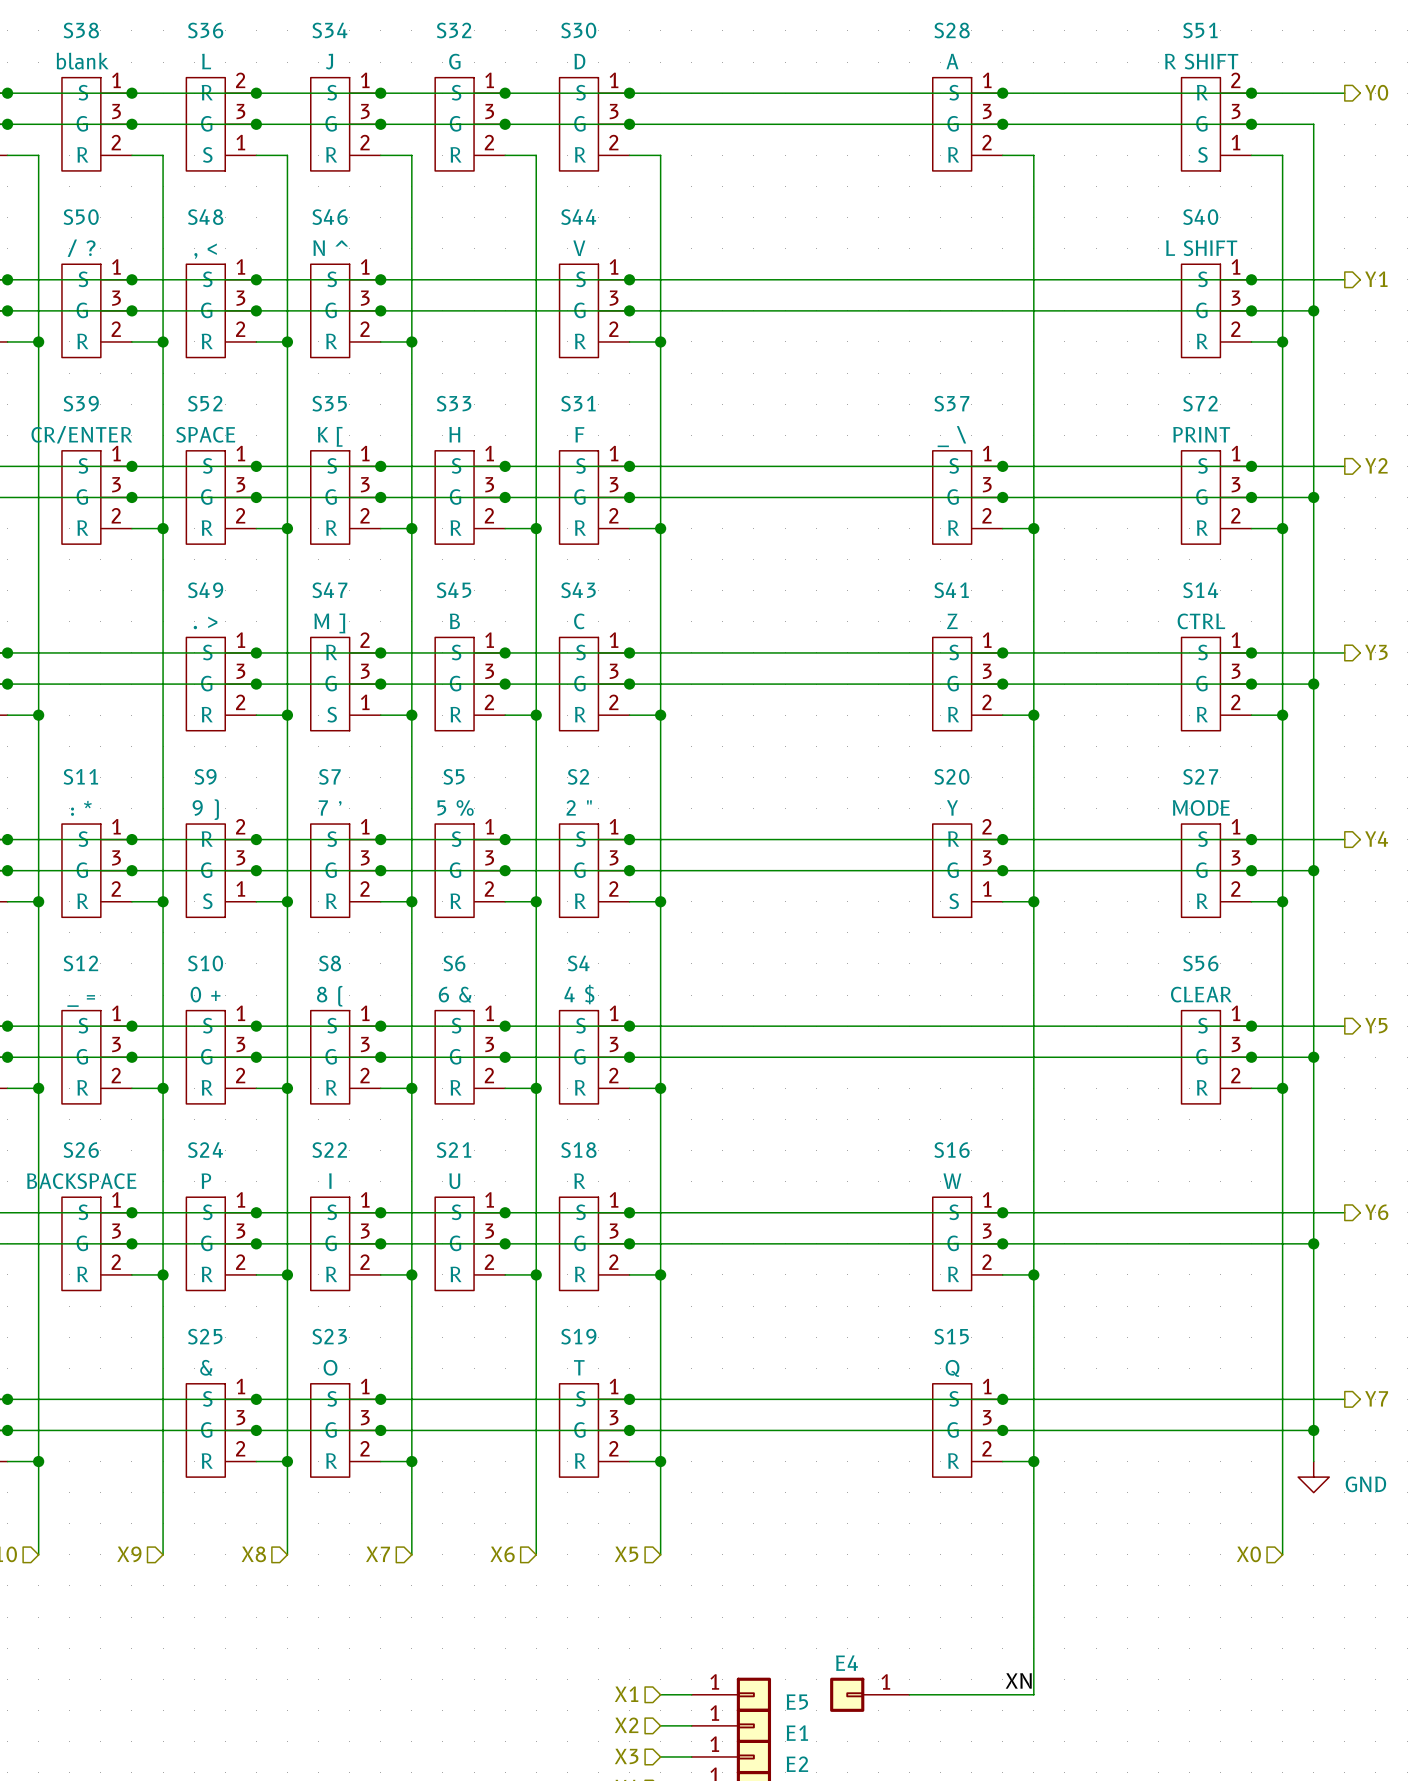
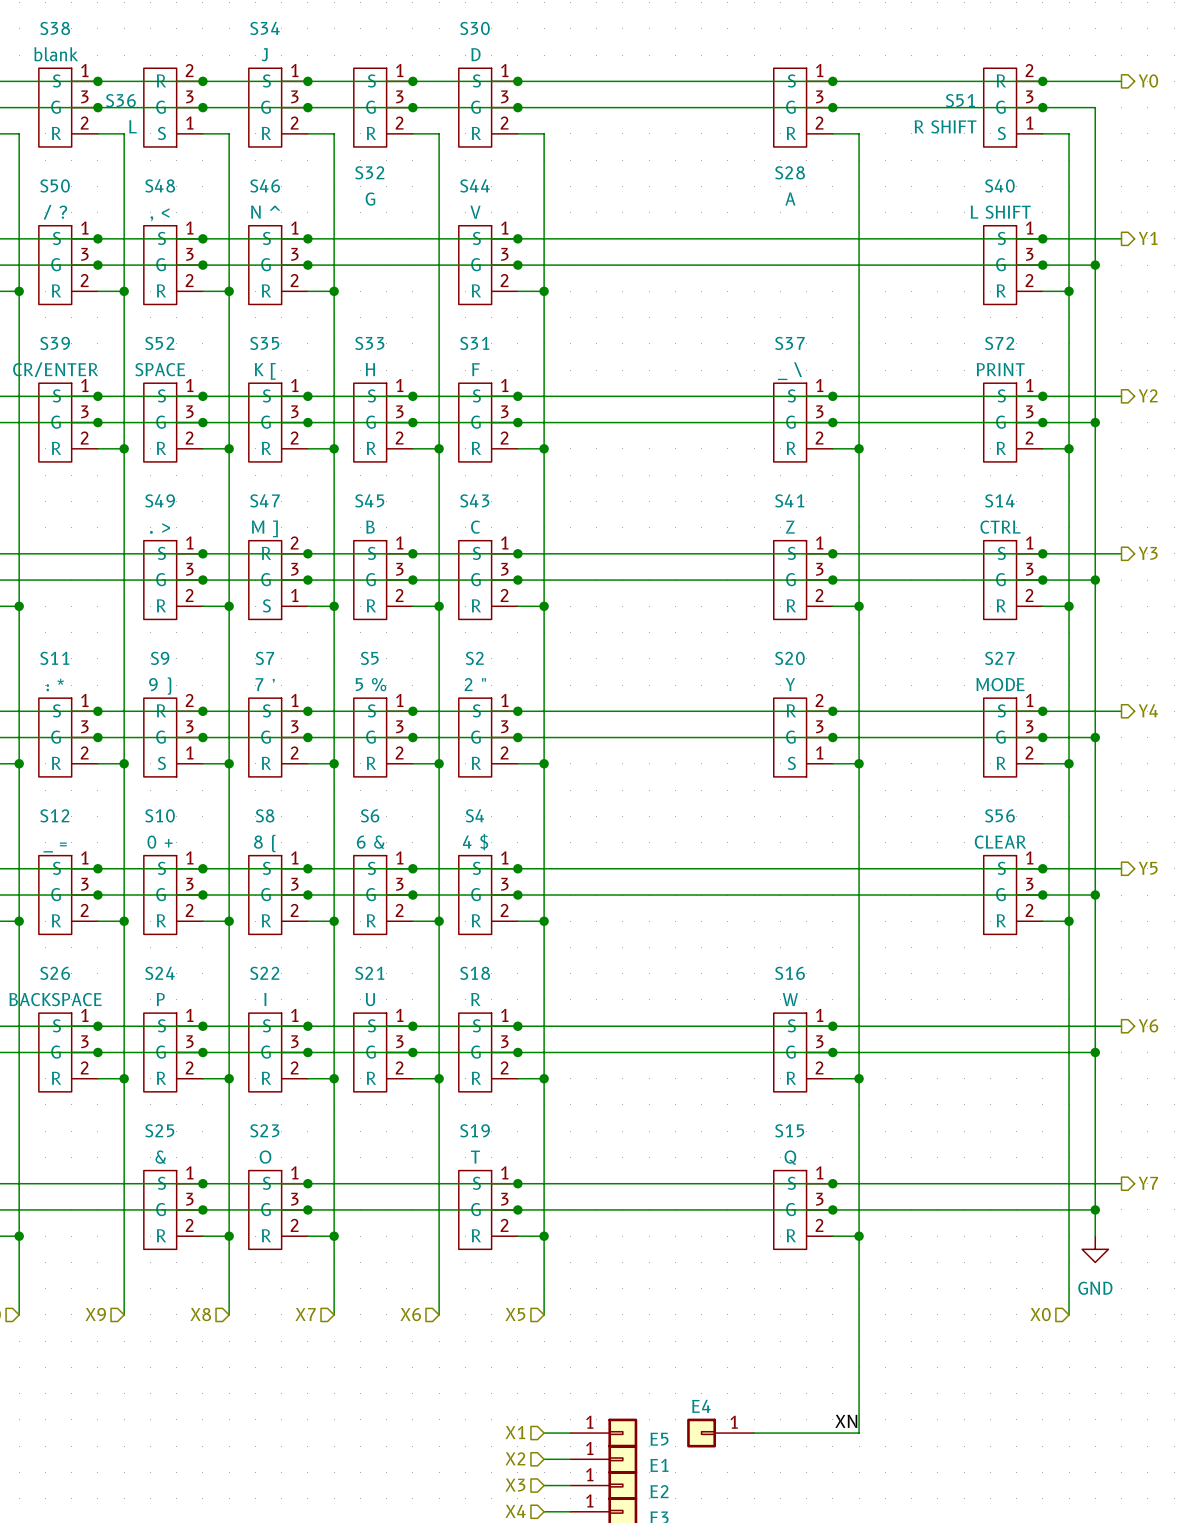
S36 name position: S36 (205, 30) -> S36 (120, 100)
S32 name position: S32 (454, 30) -> S32 (369, 172)
S28 name position: S28 (952, 30) -> S28 (790, 172)
S51 name position: S51 (1200, 30) -> S51 (960, 100)
S36 value position: L (206, 61) -> L (132, 126)
S32 value position: G (454, 61) -> G (370, 199)
S28 value position: A (952, 61) -> A (790, 198)
S51 value position: R SHIFT (1201, 61) -> R SHIFT (945, 126)
power symbol text position: GND (1365, 1484) -> GND (1095, 1288)

